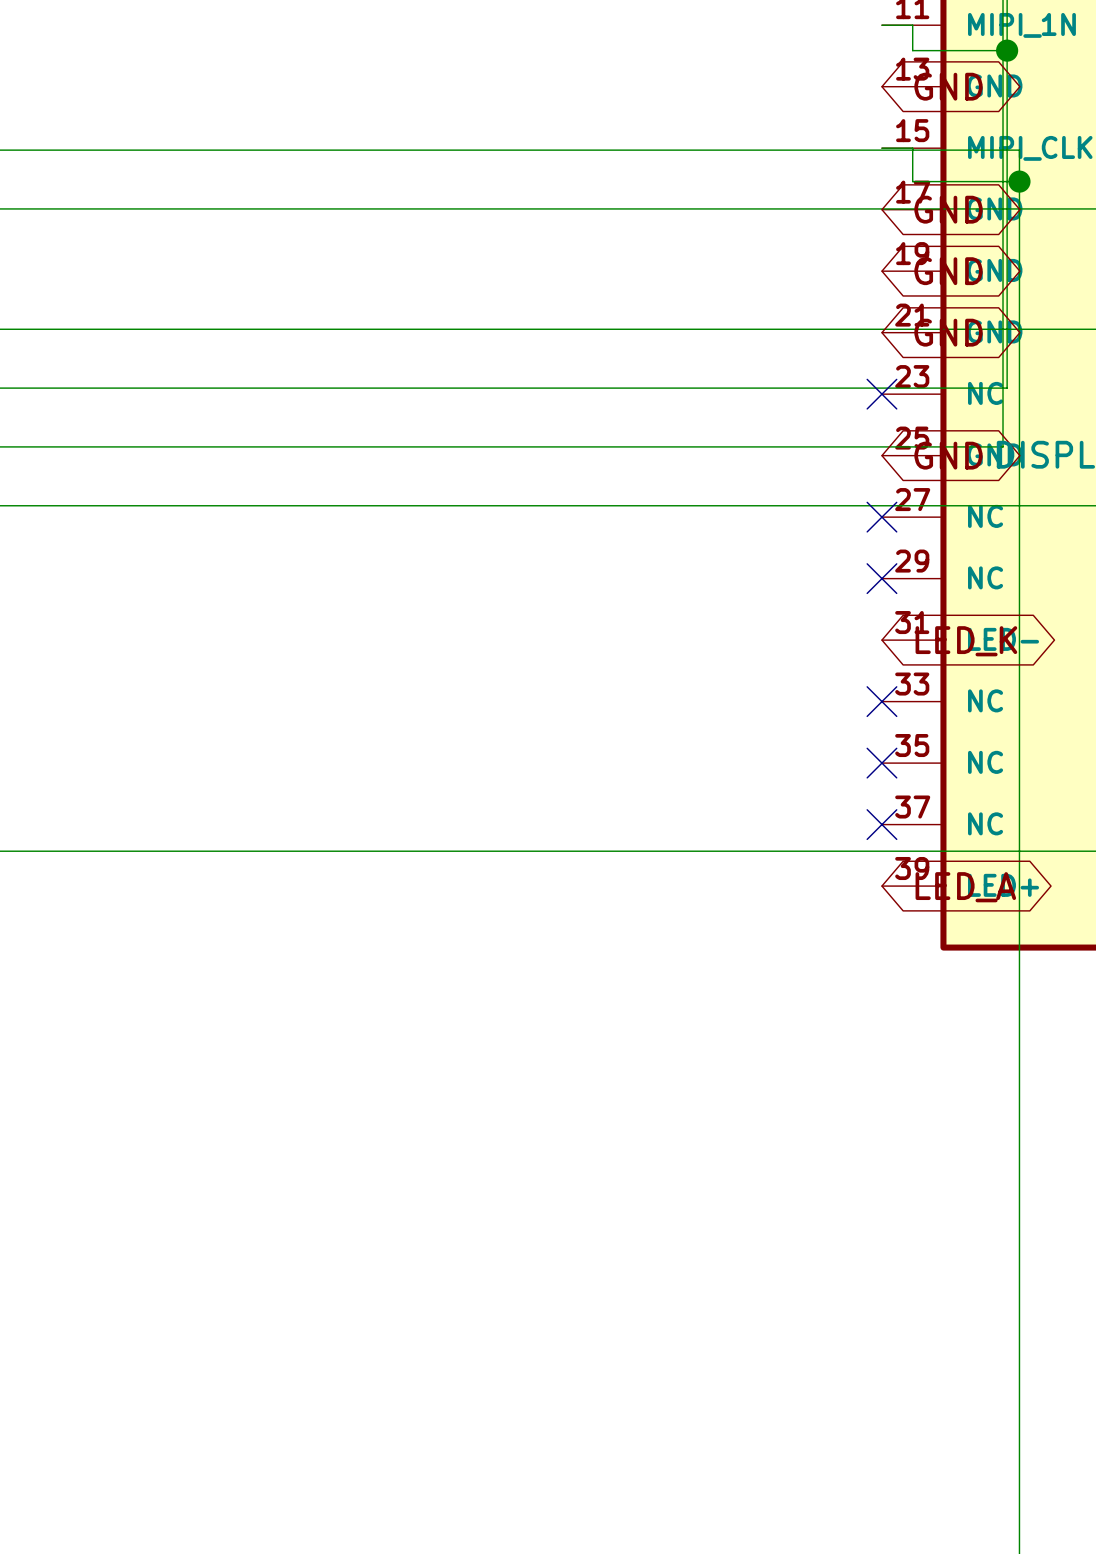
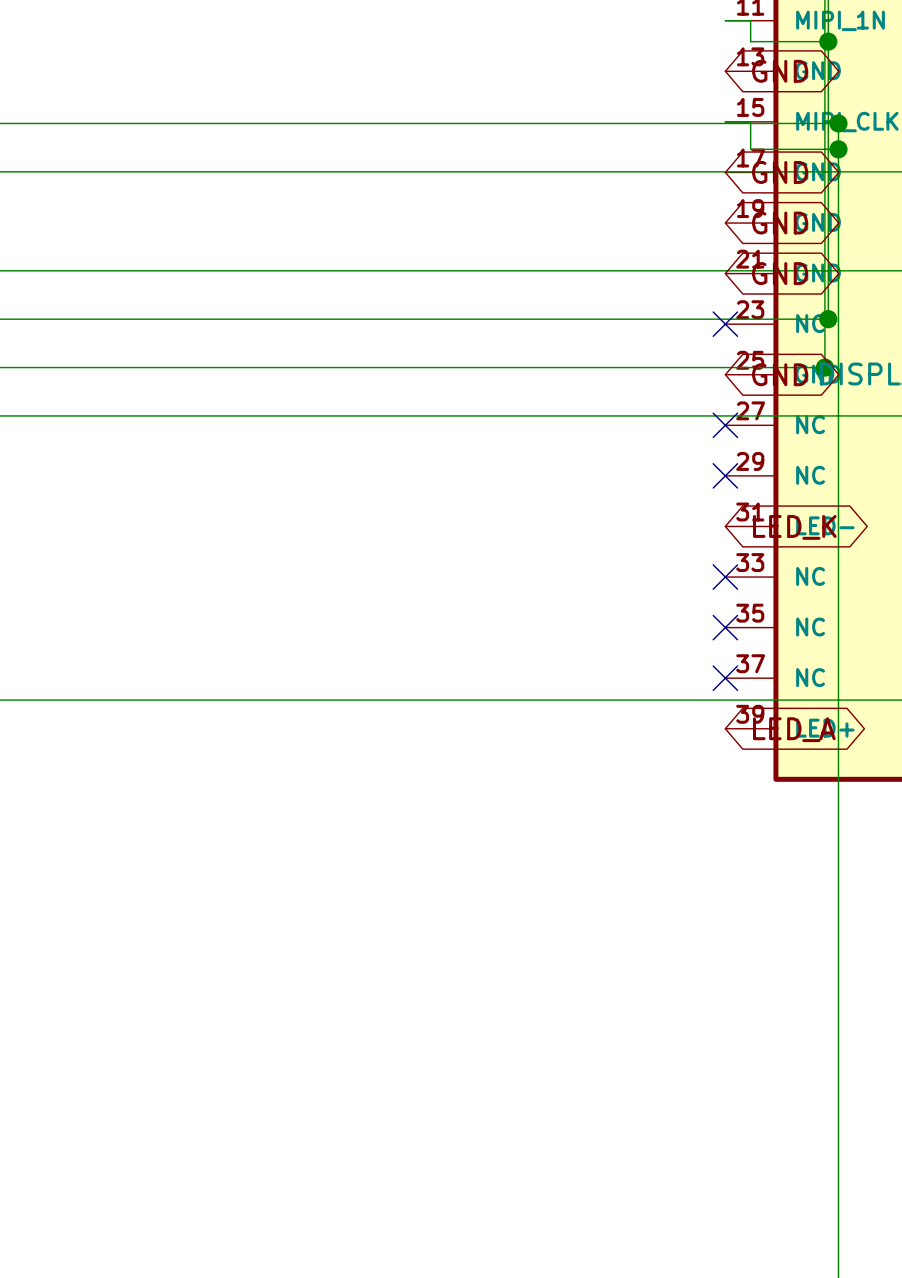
junction: none -> (838, 123)
junction: none -> (828, 319)
junction: none -> (824, 367)

